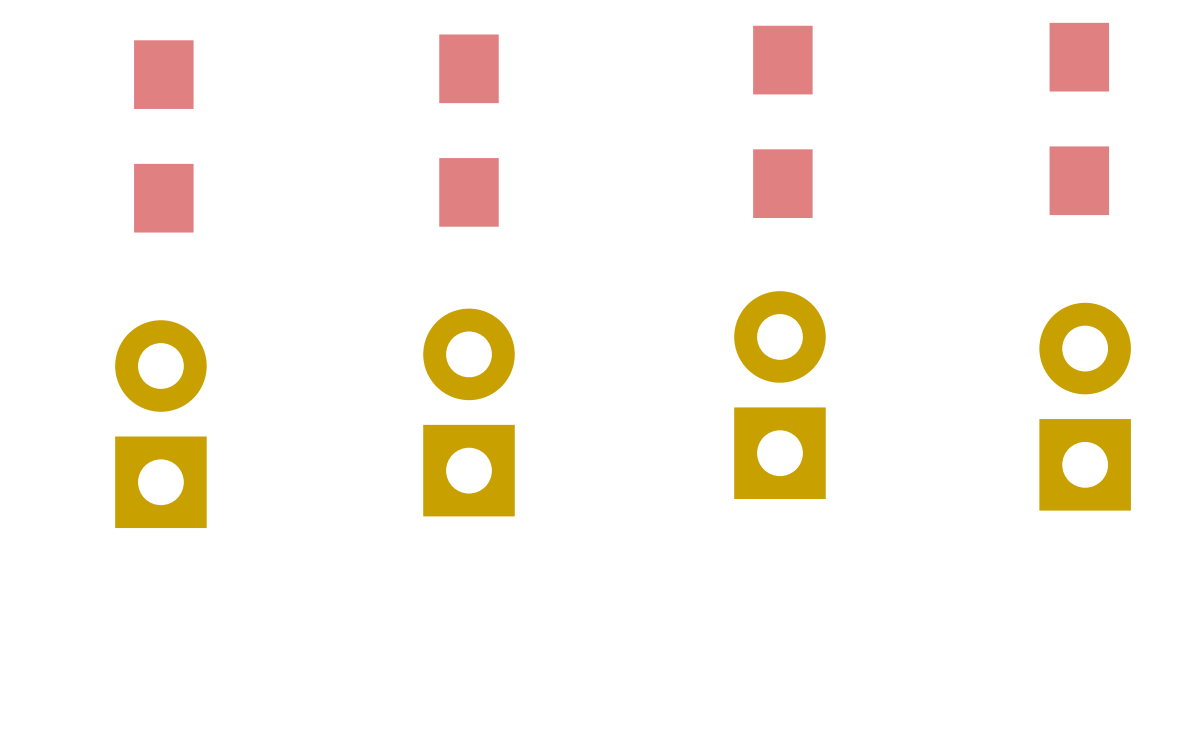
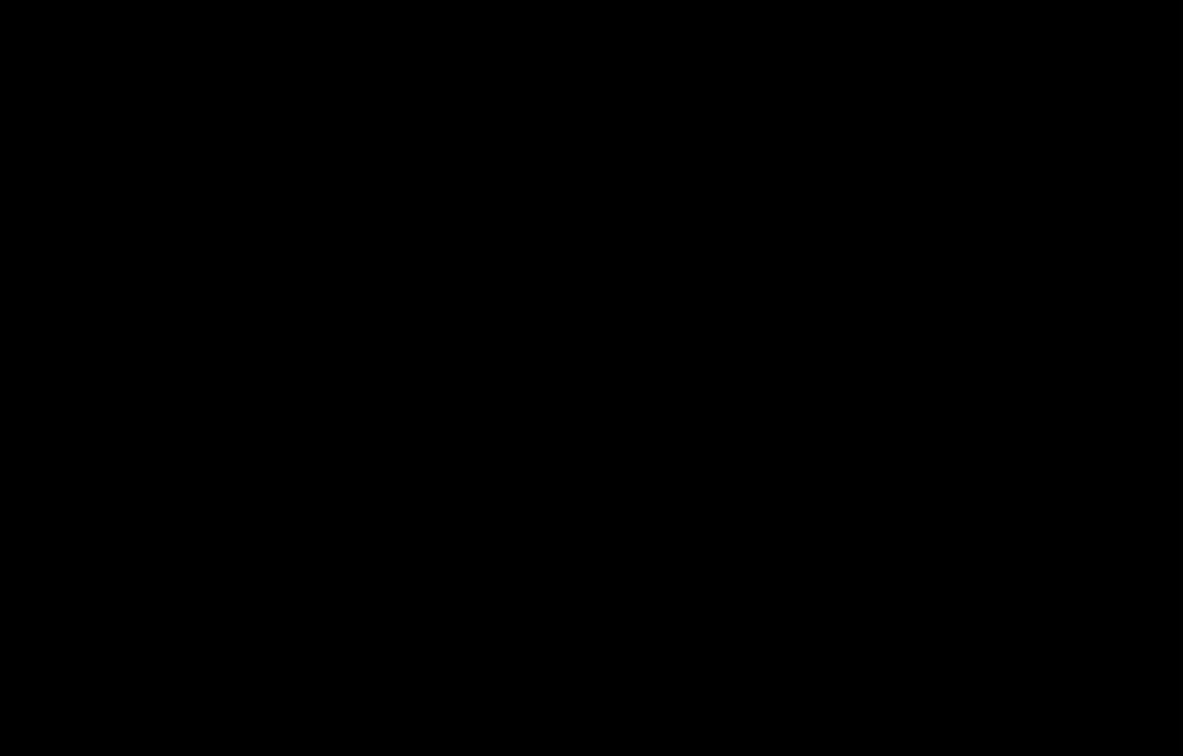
part: (1079, 118) -> none
part: (782, 121) -> none
part: (468, 130) -> none
part: (163, 136) -> none
part: (779, 395) -> none
part: (1085, 406) -> none
part: (468, 412) -> none
part: (160, 424) -> none

